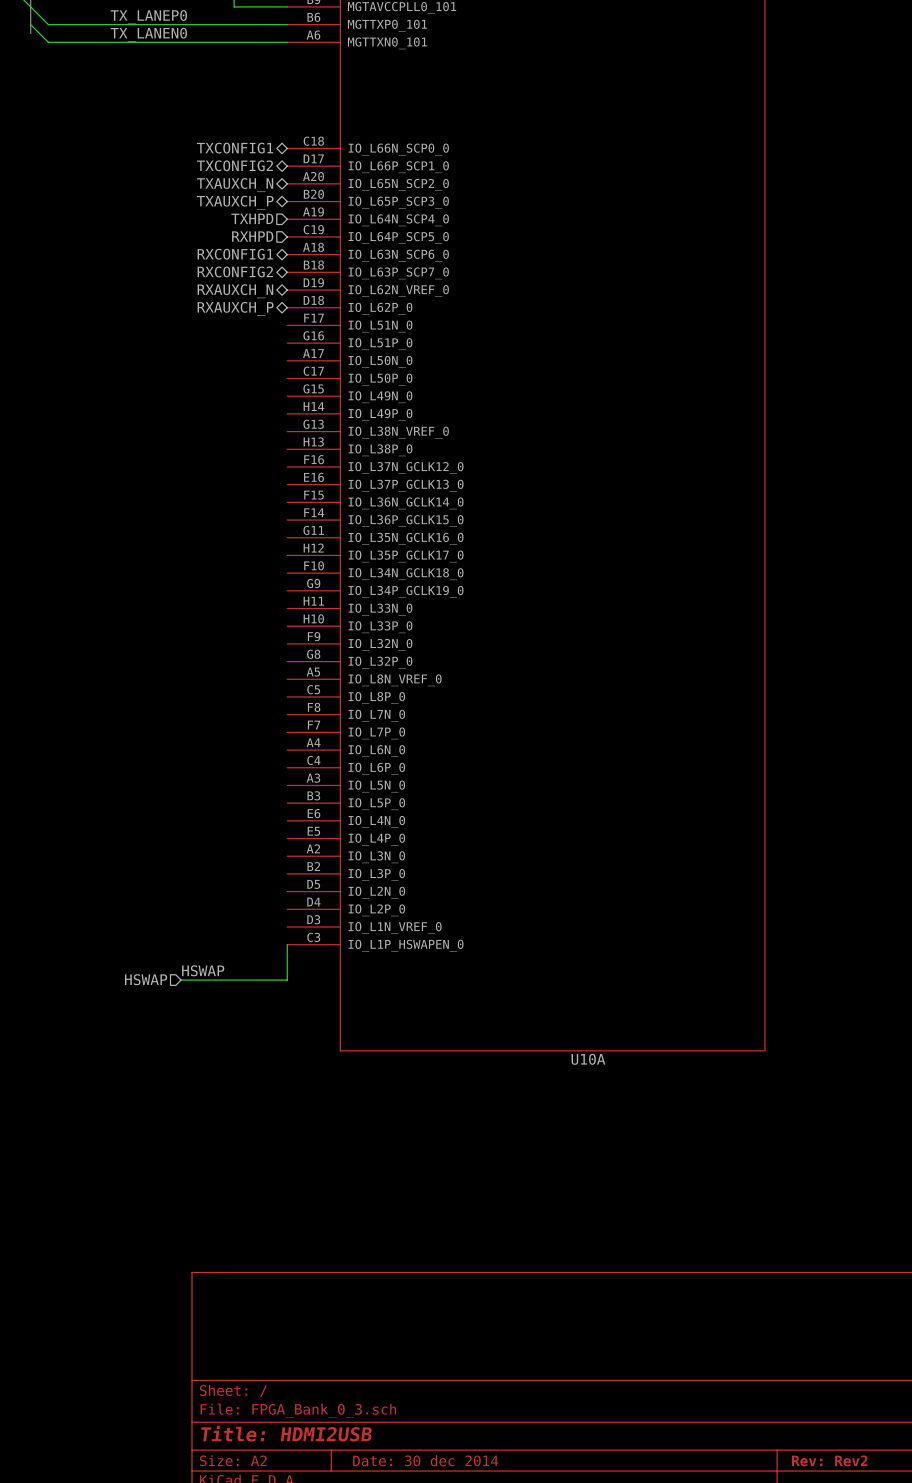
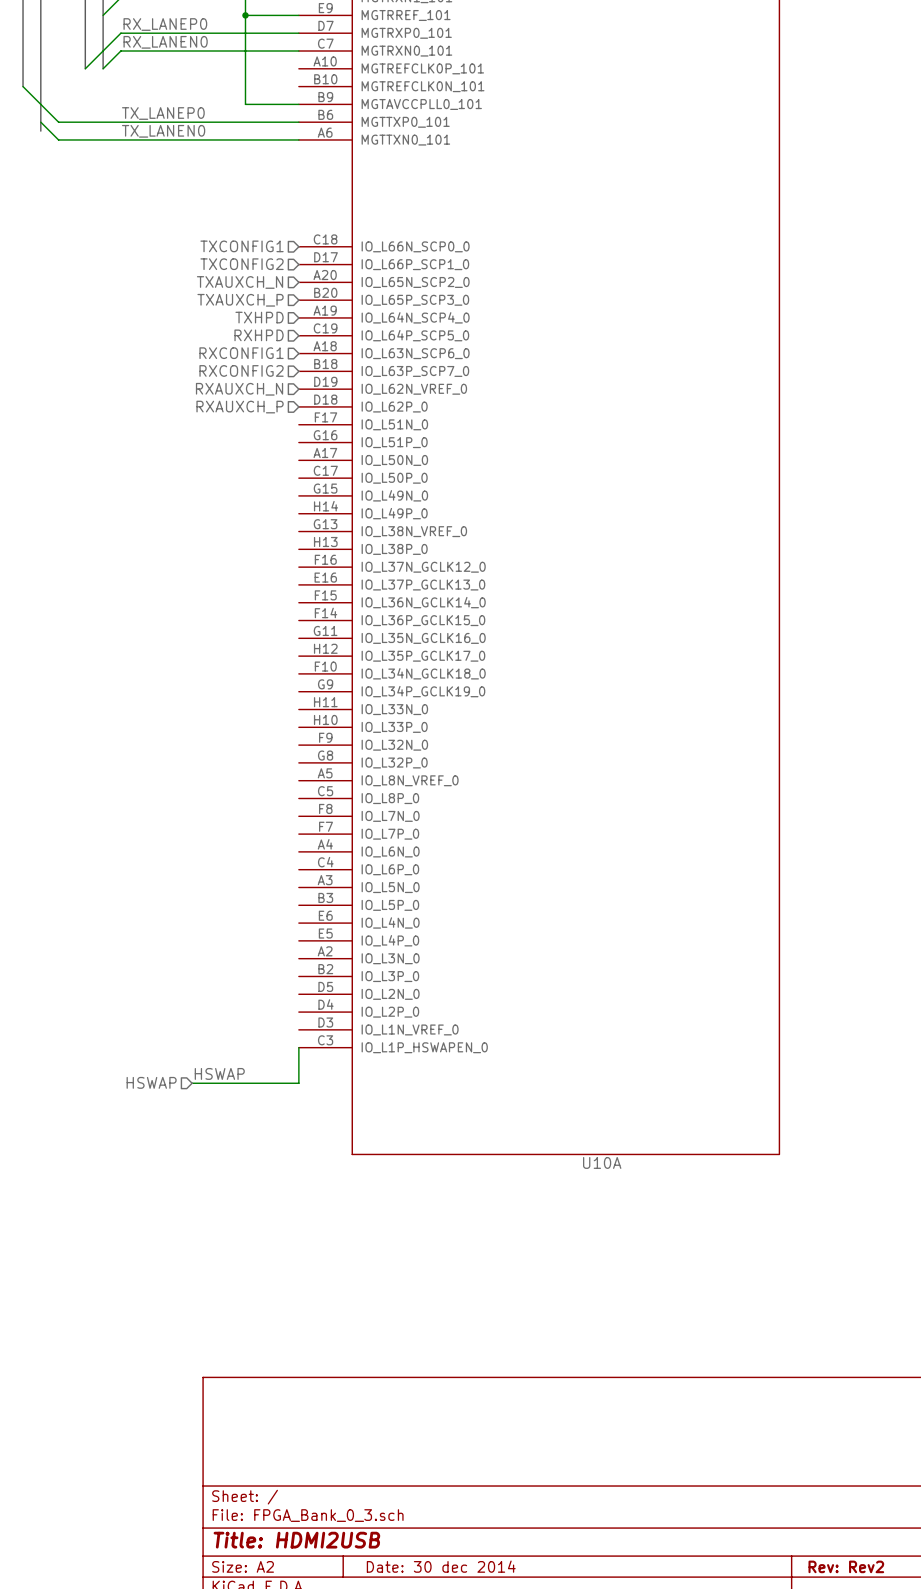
hierarchical label shape: bidirectional (235, 148) -> input (242, 246)
hierarchical label shape: bidirectional (234, 165) -> input (242, 264)
hierarchical label shape: bidirectional (235, 185) -> input (240, 282)
hierarchical label shape: bidirectional (235, 202) -> input (240, 300)
hierarchical label shape: bidirectional (235, 254) -> input (241, 353)
hierarchical label shape: bidirectional (235, 271) -> input (241, 370)
hierarchical label shape: bidirectional (235, 291) -> input (239, 389)
hierarchical label shape: bidirectional (235, 308) -> input (240, 407)

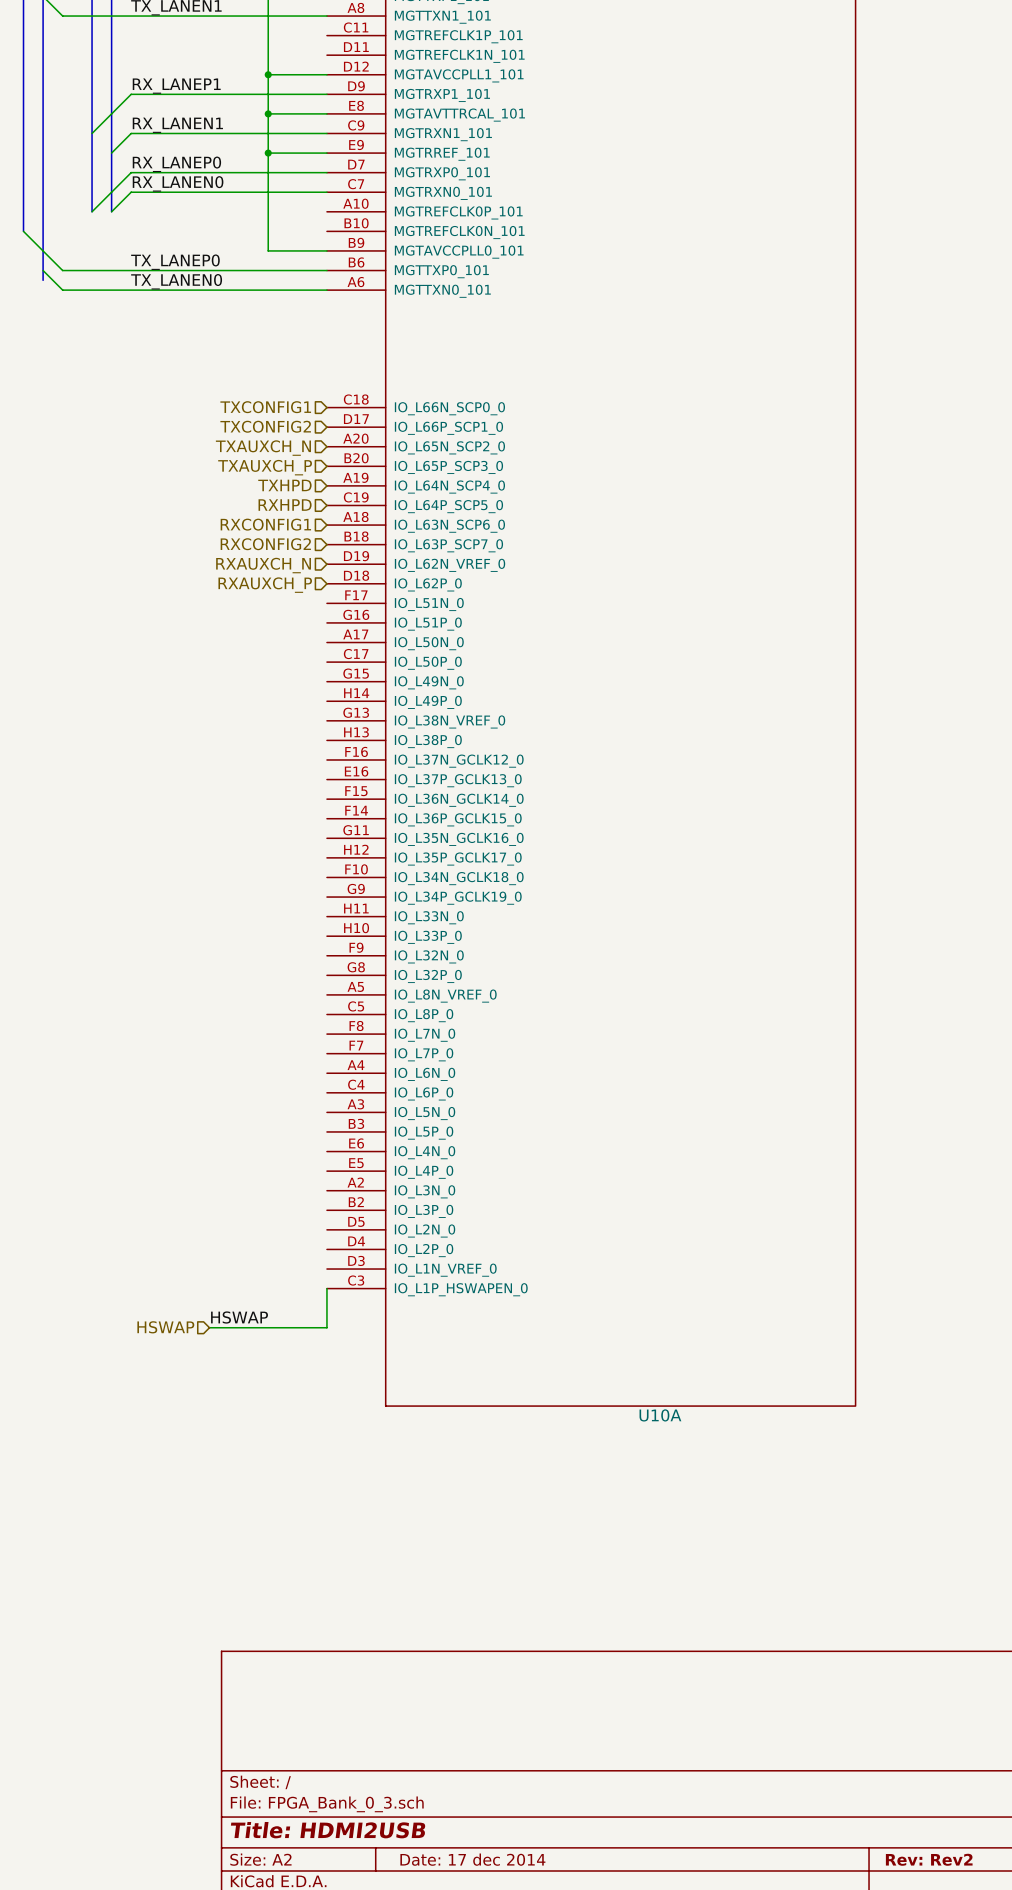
title block: Date: 30 dec 2014 (441, 1566) -> Date: 17 dec 2014 (472, 1859)

